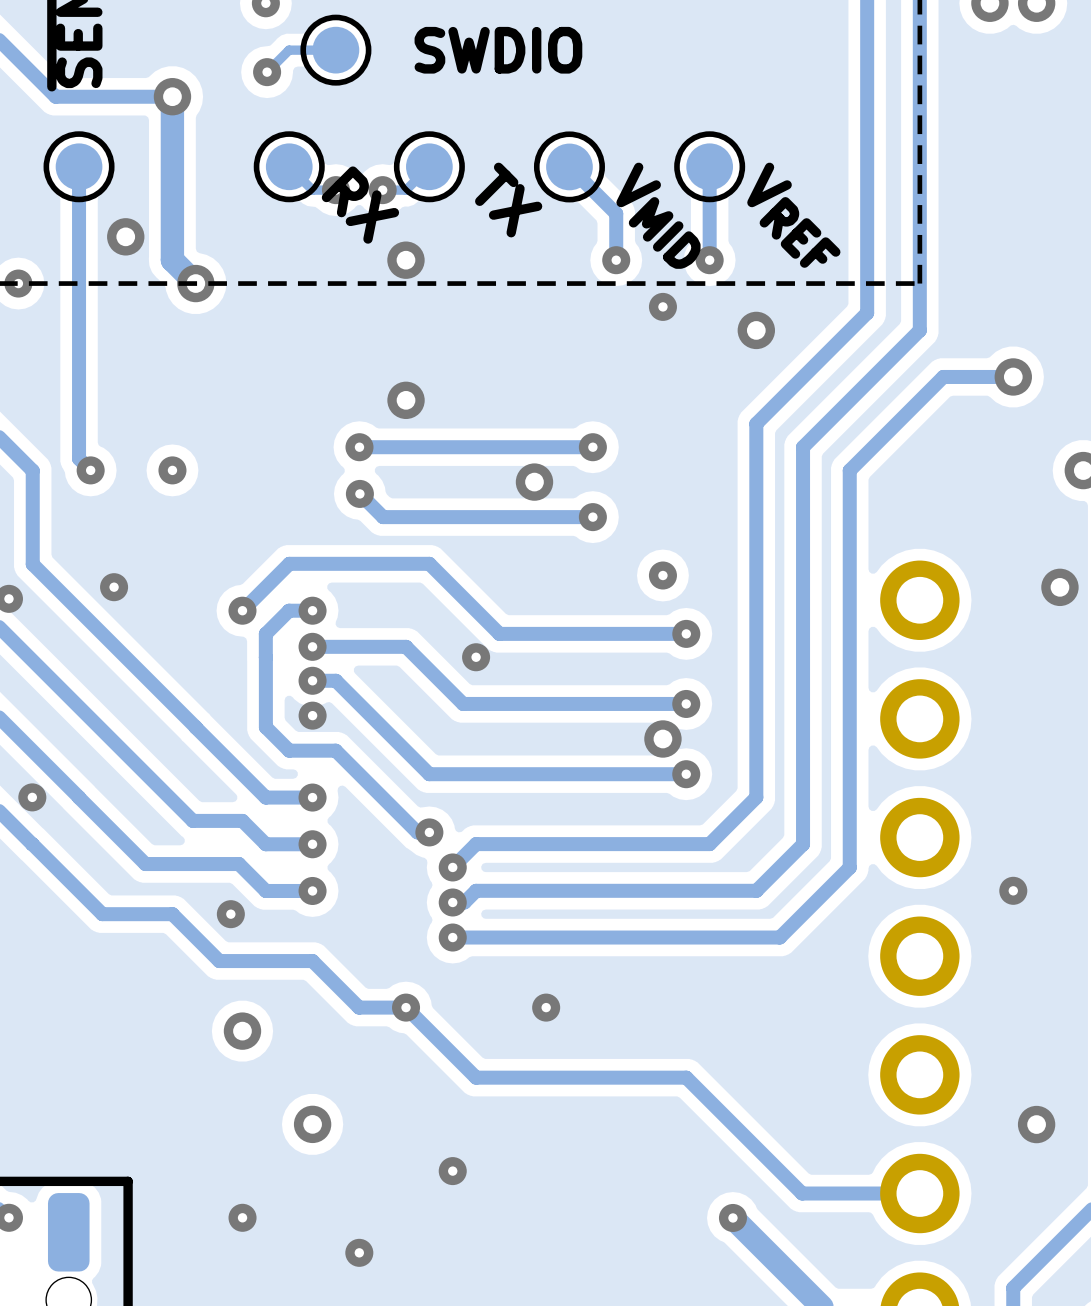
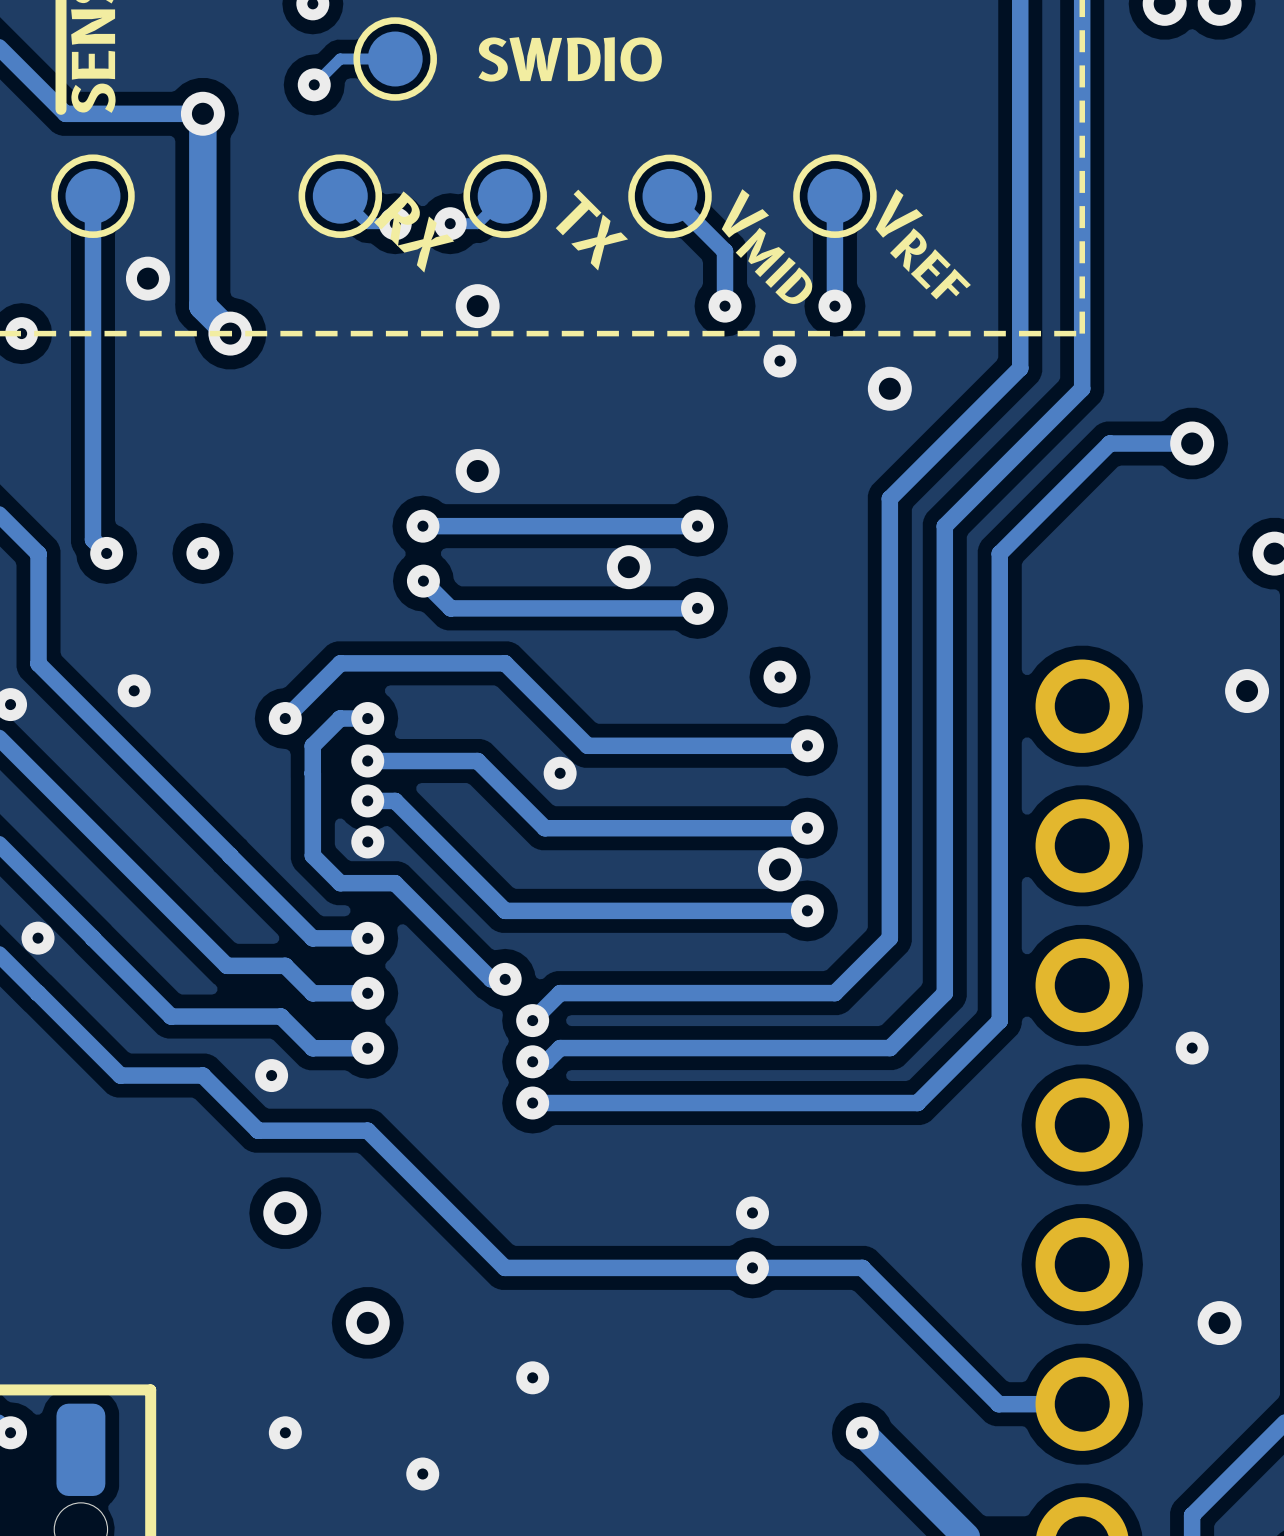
track: (359, 1007) (406, 1007) (476, 1077) -> (422, 1185) (504, 1267) (560, 1267)
via: (406, 1007) -> none
via: (546, 1007) -> none
via: none -> (752, 1212)
via: none -> (752, 1267)
track: (686, 1077) (802, 1193) (848, 1193) -> (807, 1267) (862, 1267) (998, 1404)

